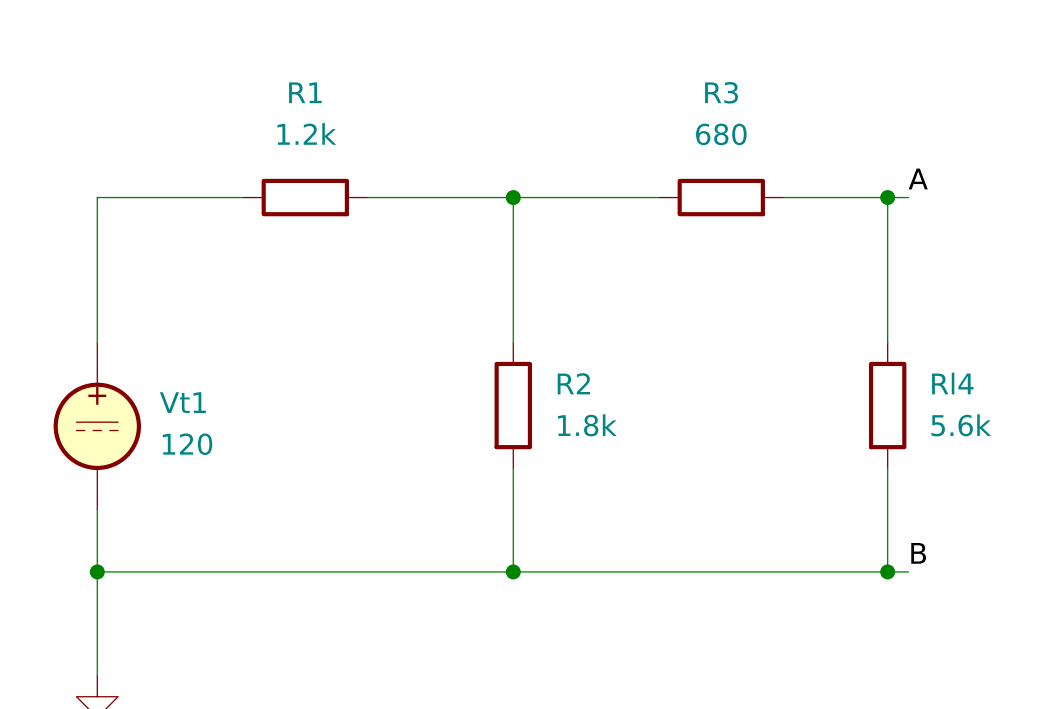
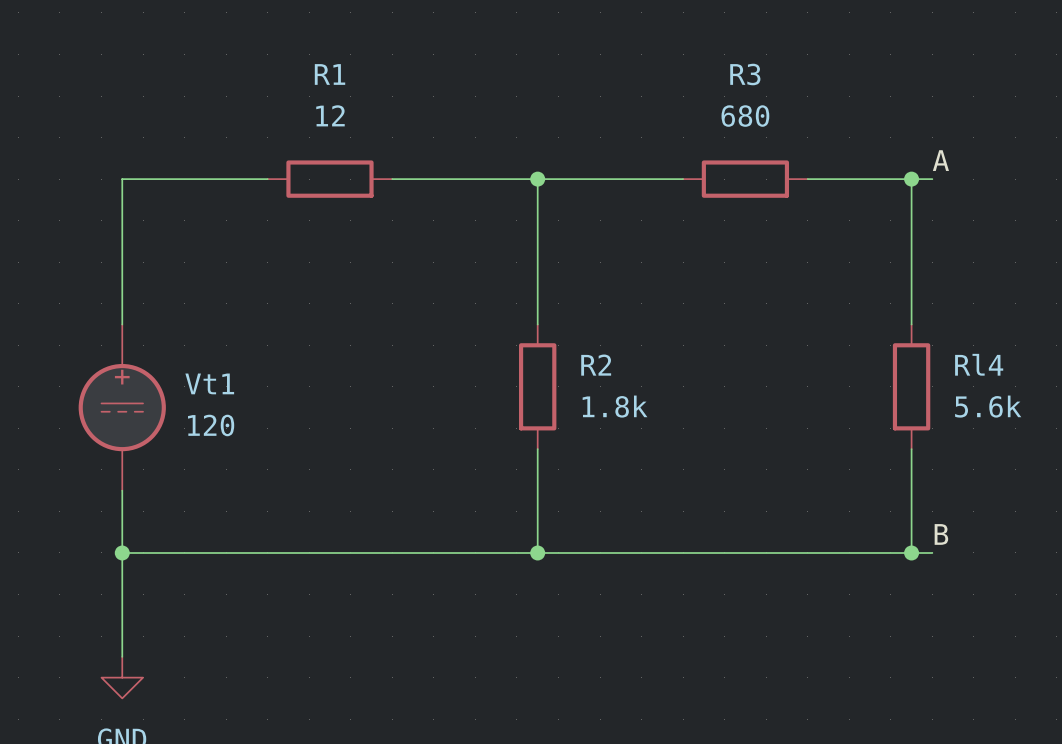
R1 value: 1.2k (306, 133) -> 12 (330, 115)

